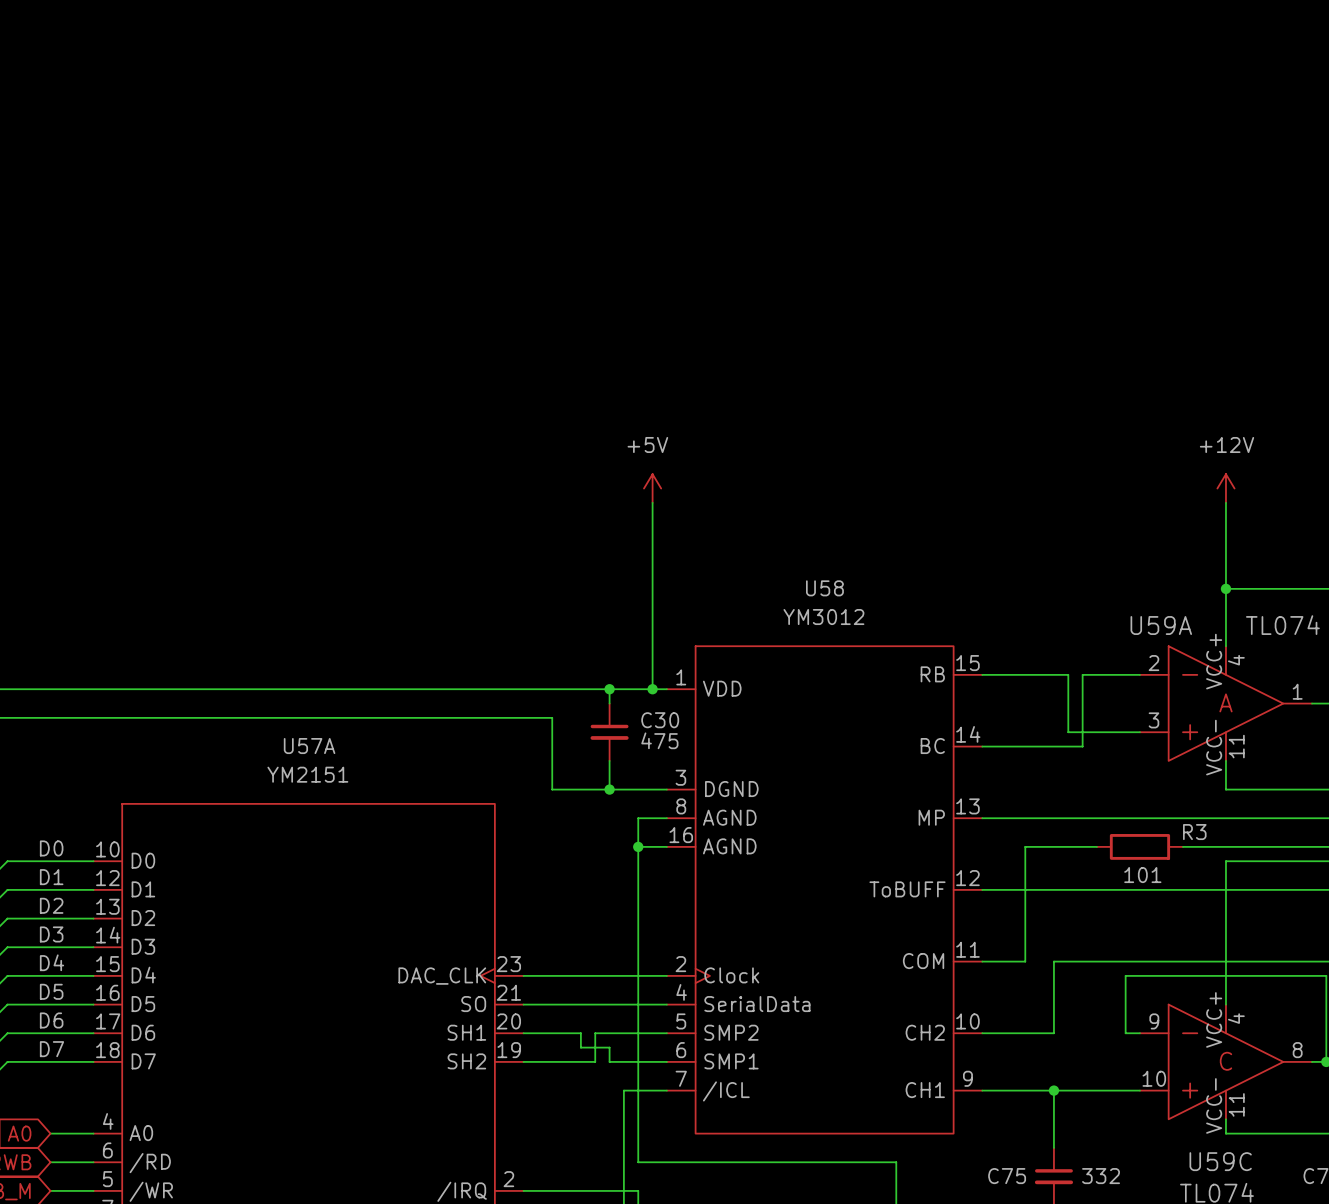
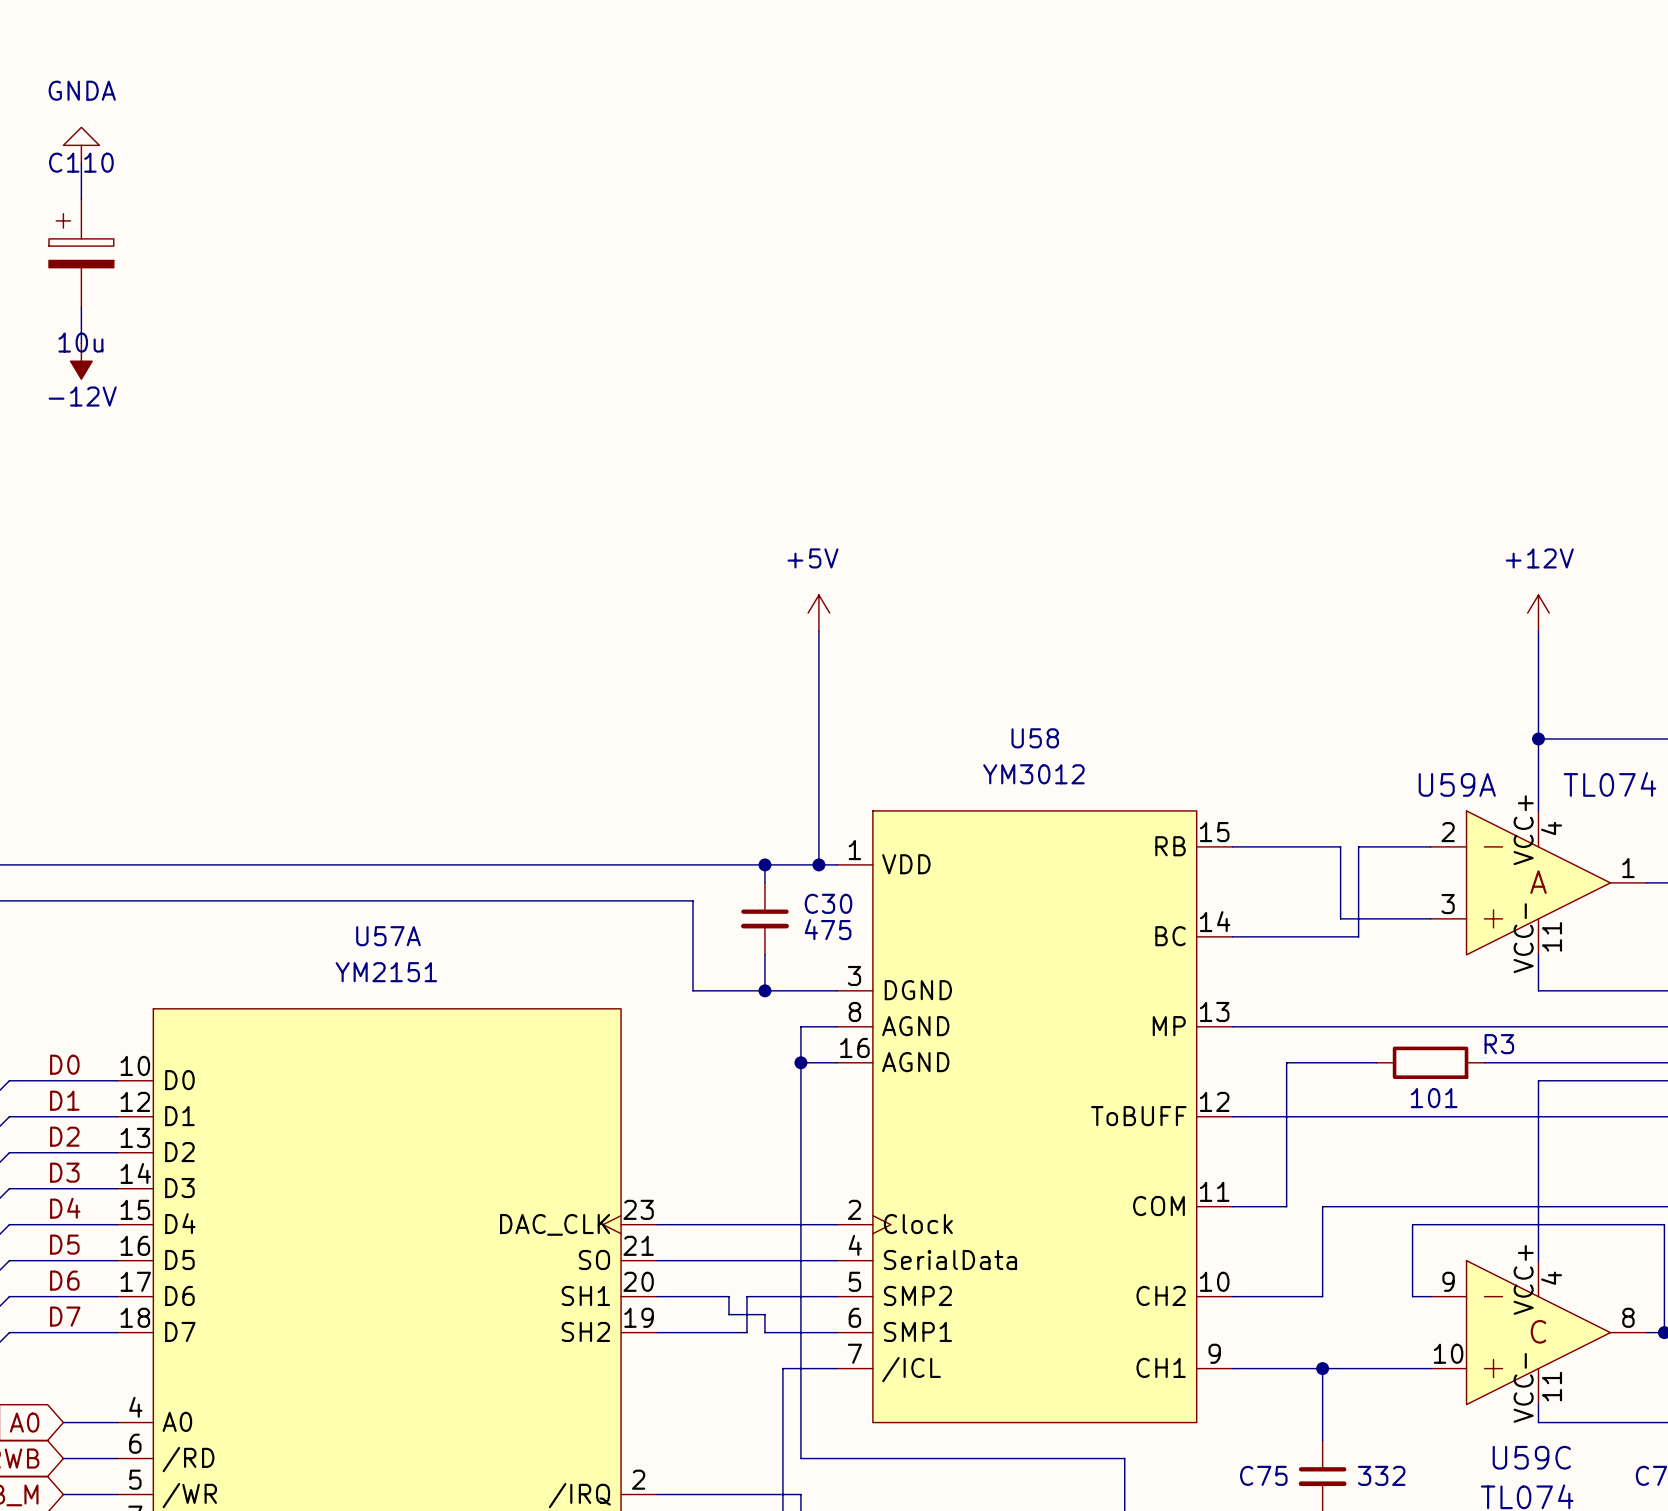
power symbol: none -> GNDA (81, 145)
wire: none -> (81, 163) (81, 199)
C110: none -> 10u (81, 253)
wire: none -> (81, 307) (81, 343)
power symbol: none -> -12V (81, 361)

